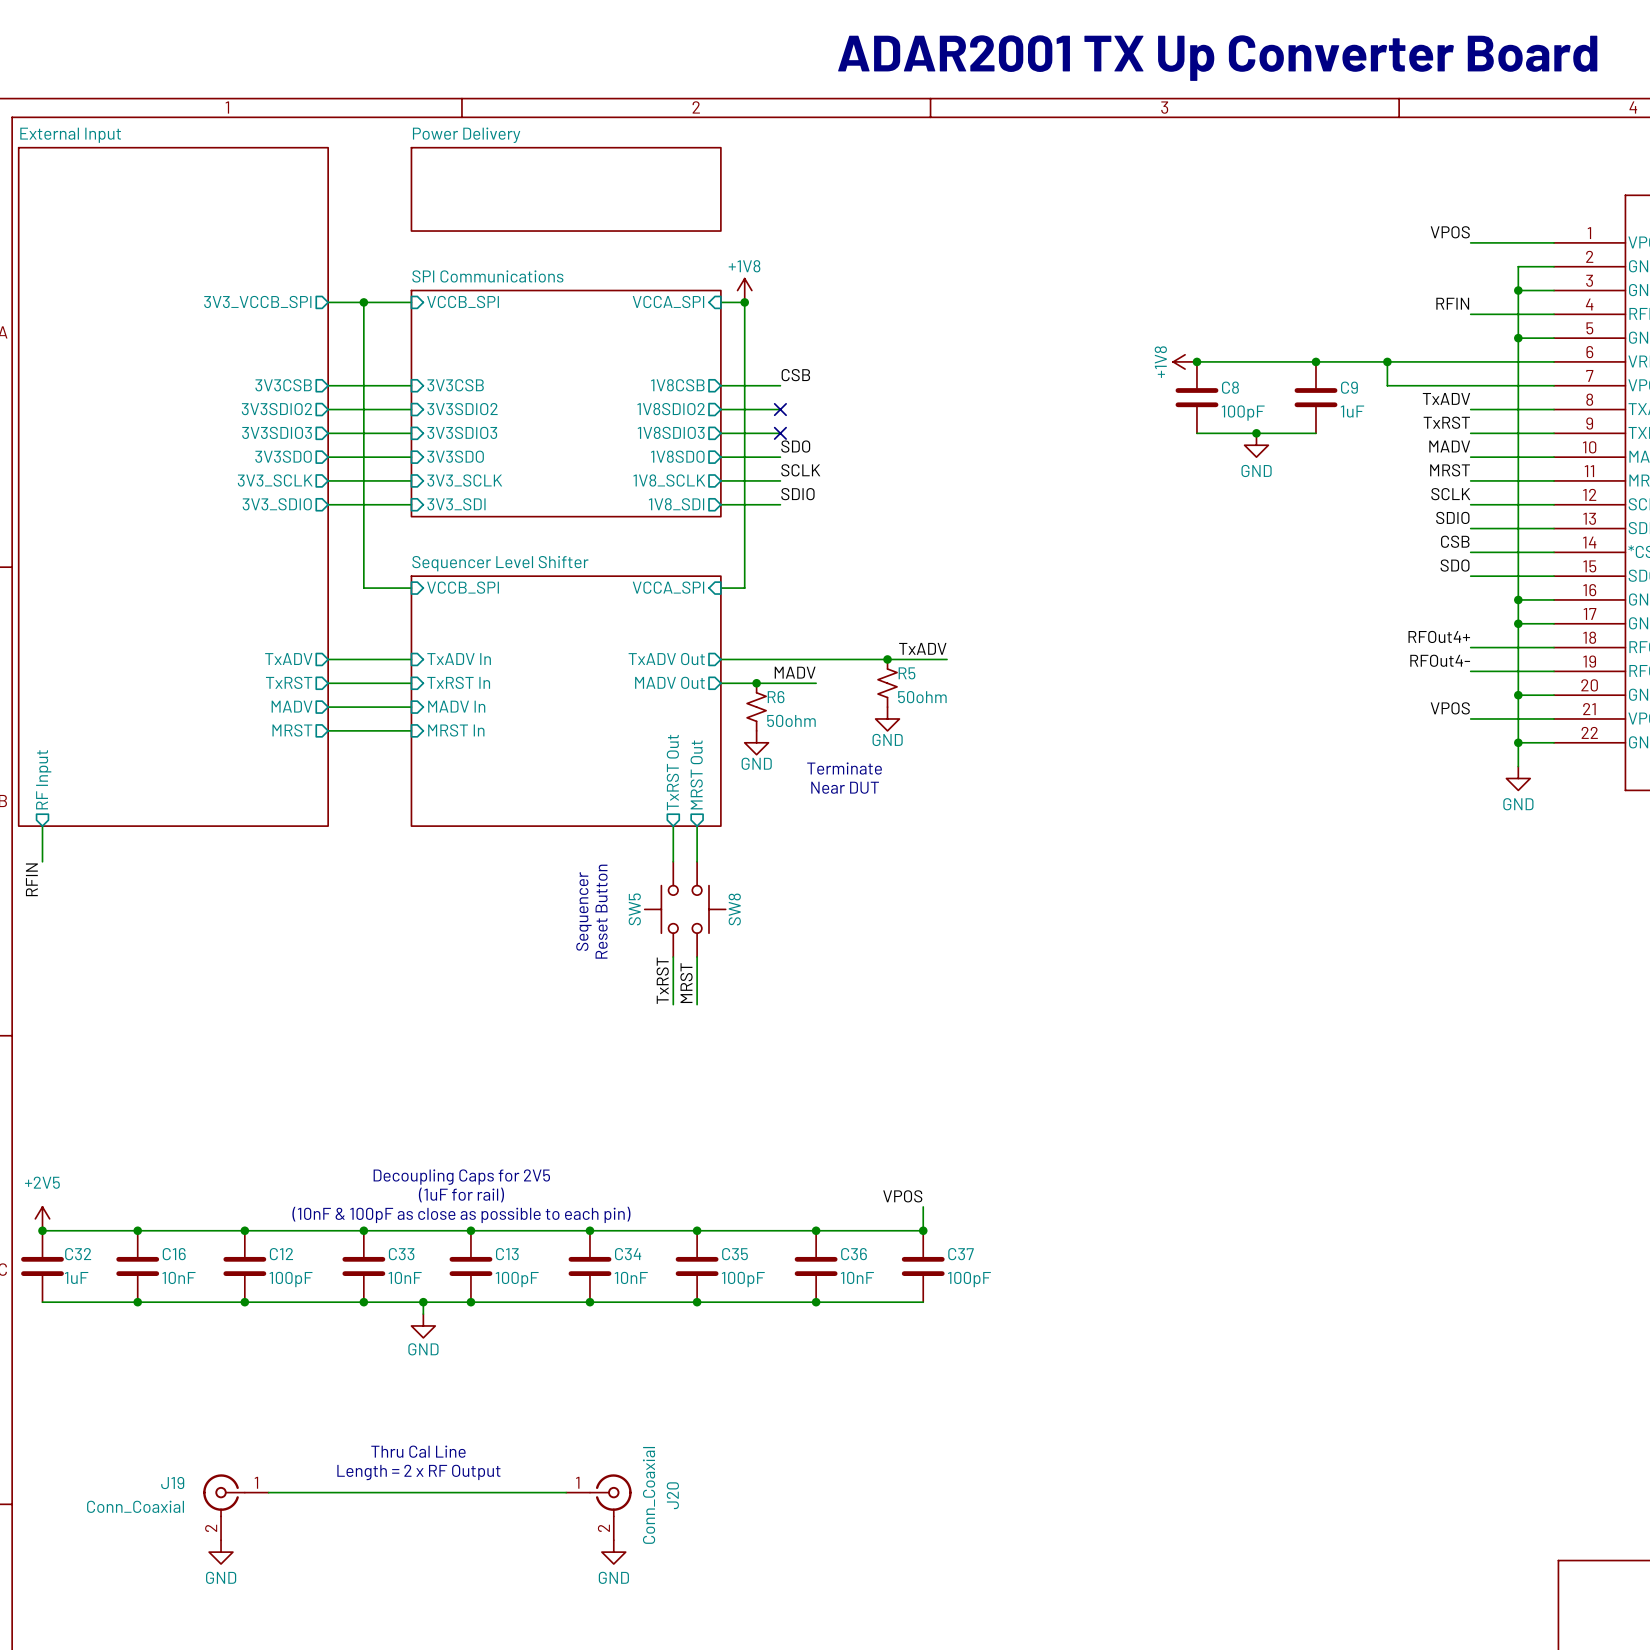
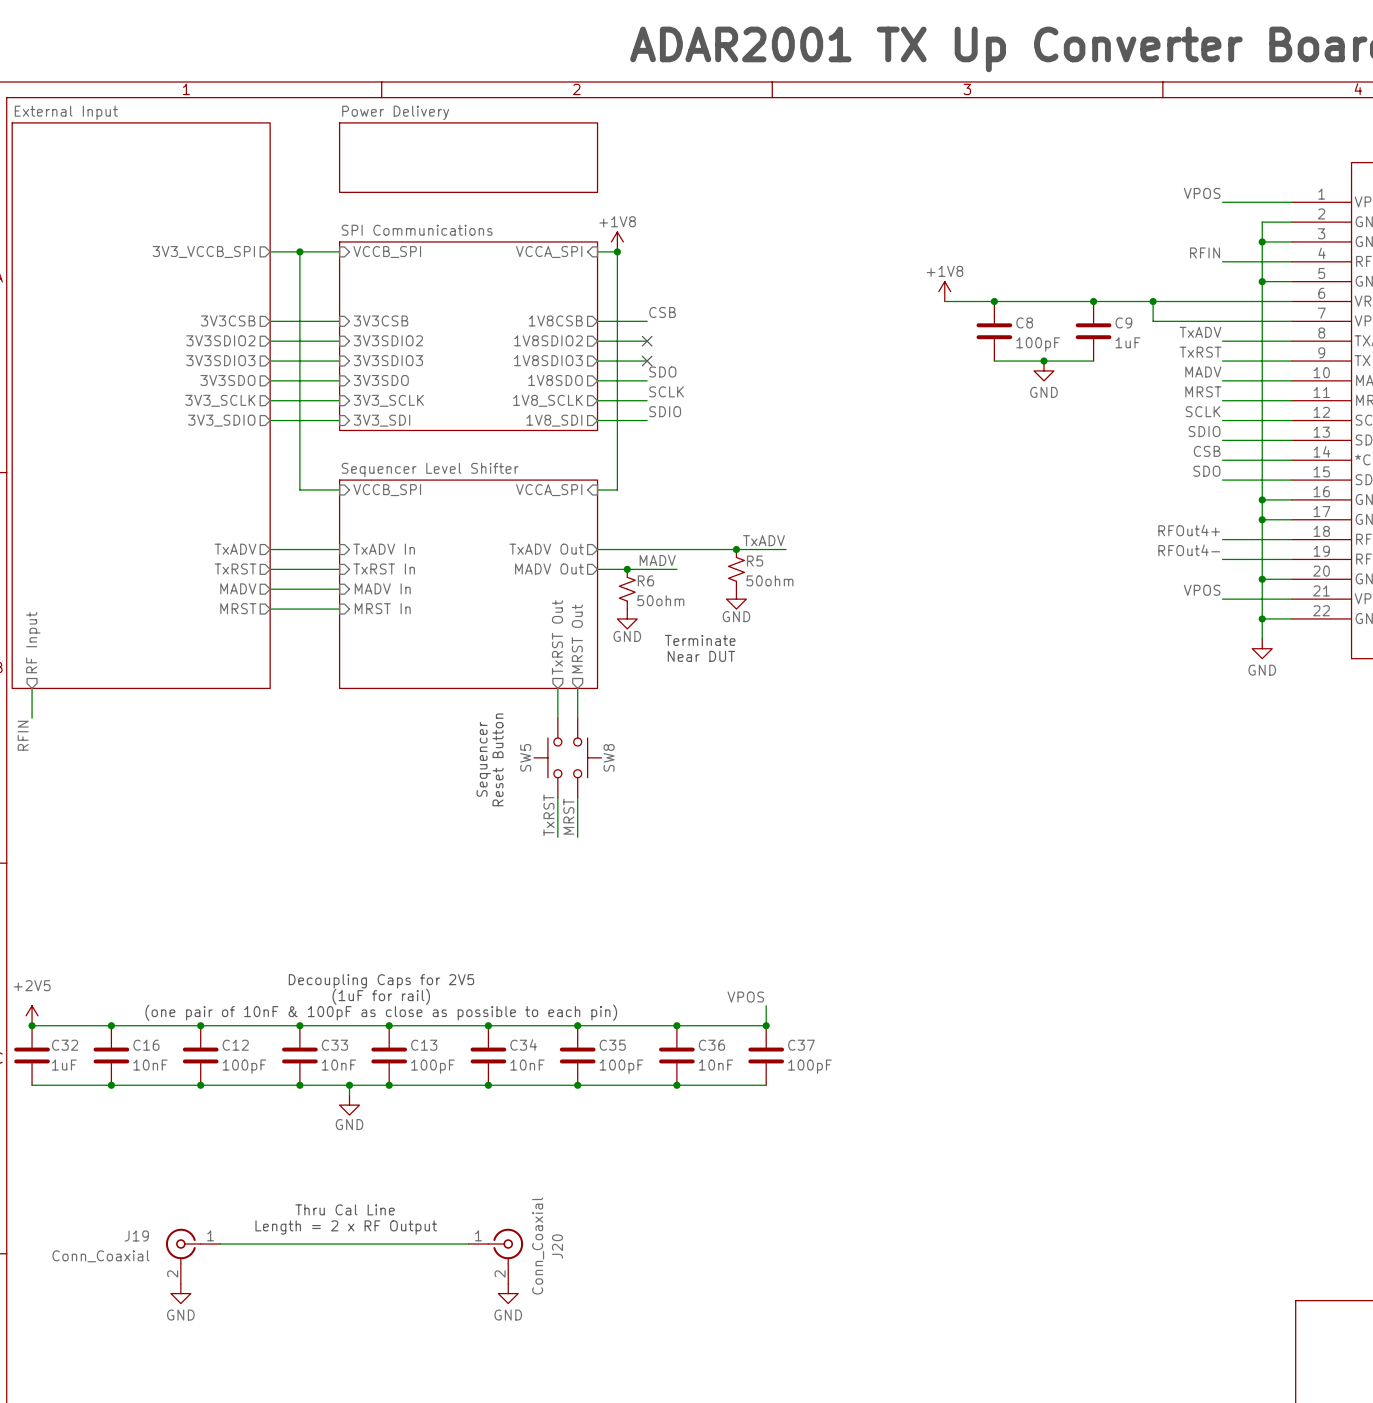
wire: none -> (944, 301) (994, 301)
power symbol rotation: 0° (1185, 361) -> 90° clockwise (944, 291)
power symbol position: +1V8 (1185, 361) -> +1V8 (944, 291)
text: (10nF & 100pF as close as possible to each pin) (461, 1214) -> (one pair of 10nF & 100pF as close as possible to each pin) (381, 1012)

